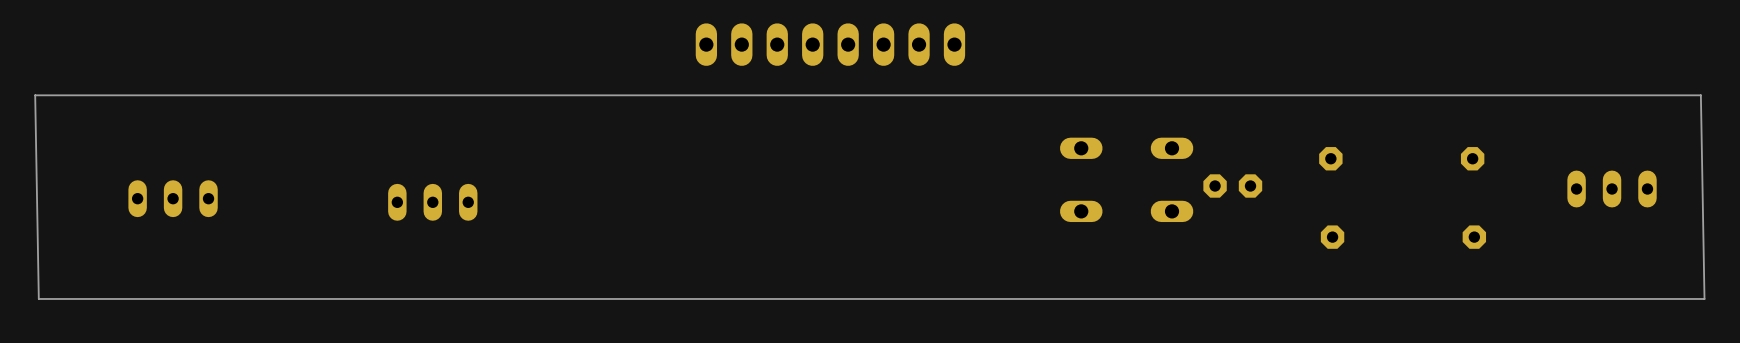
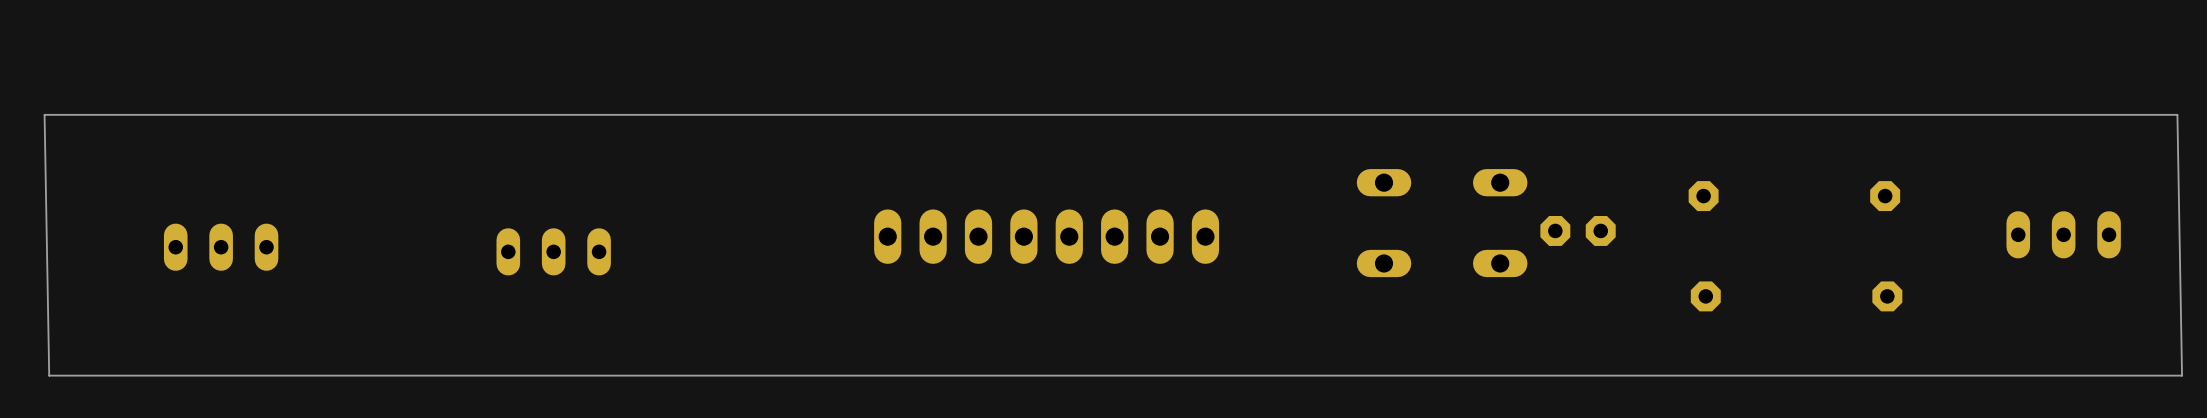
part position: (830, 44) -> (1046, 236)

